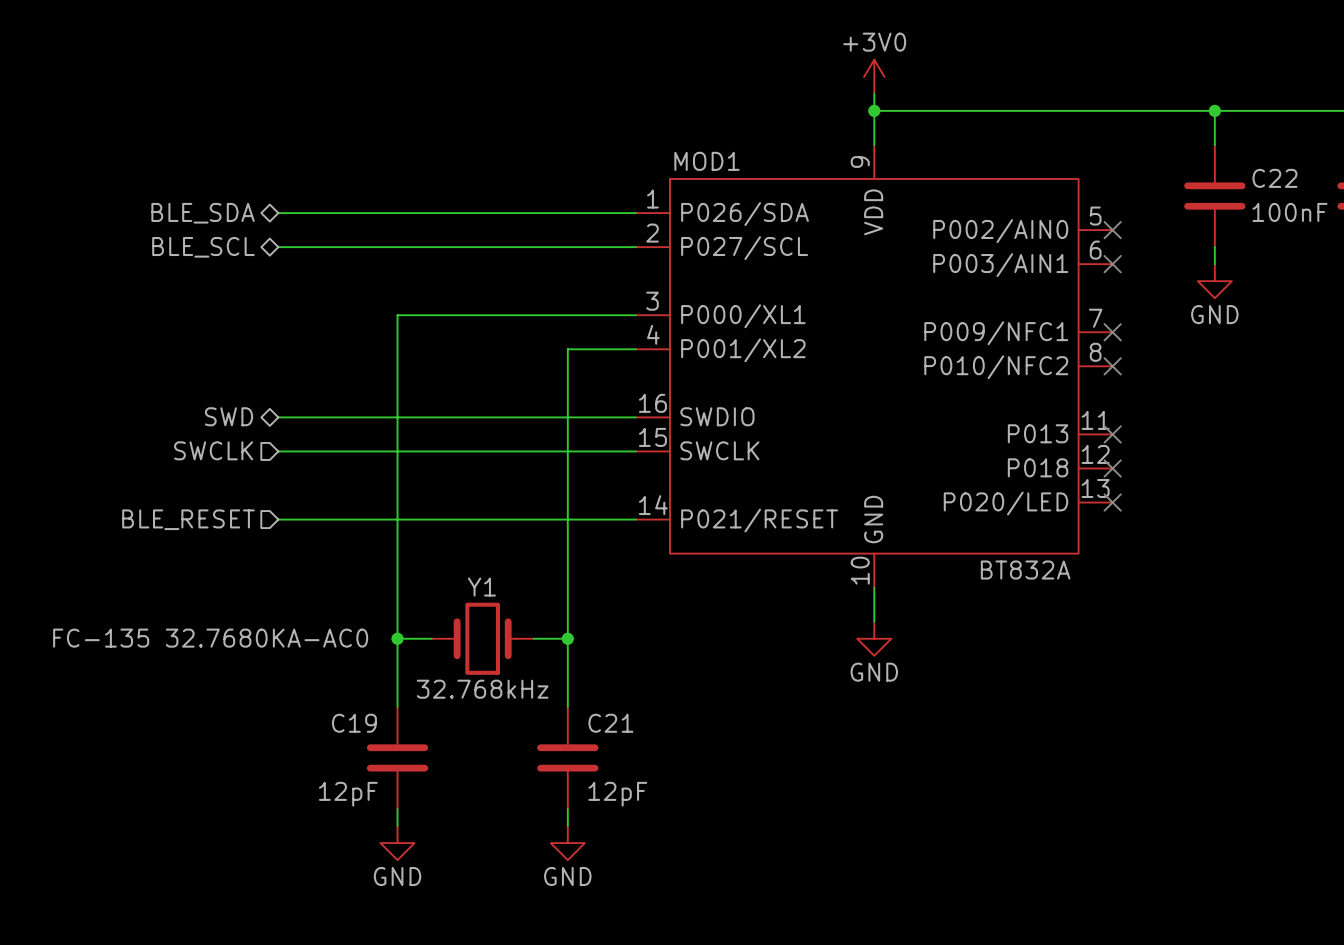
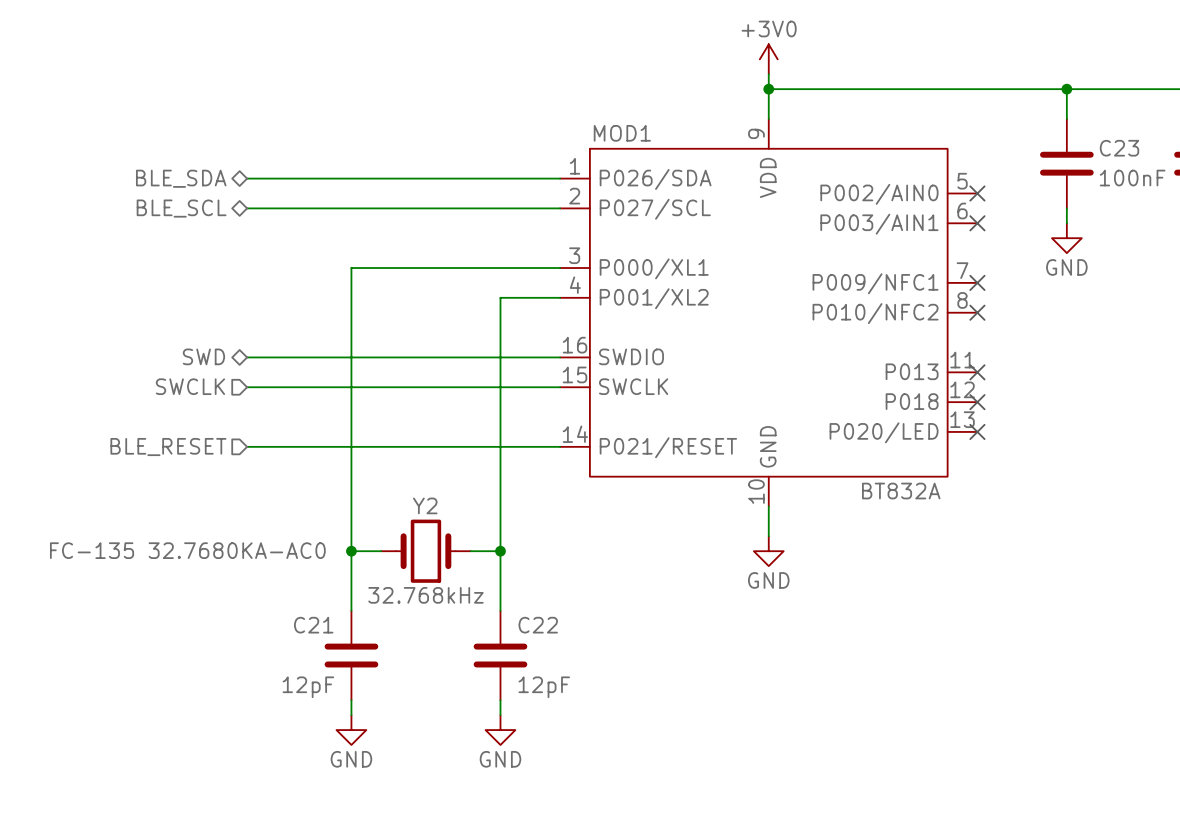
C22 name: C22 (1274, 178) -> C23 (1119, 148)
Y1 name: Y1 (481, 587) -> Y2 (425, 505)
C19 name: C19 (354, 723) -> C21 (313, 625)
C21 name: C21 (610, 723) -> C22 (538, 625)

